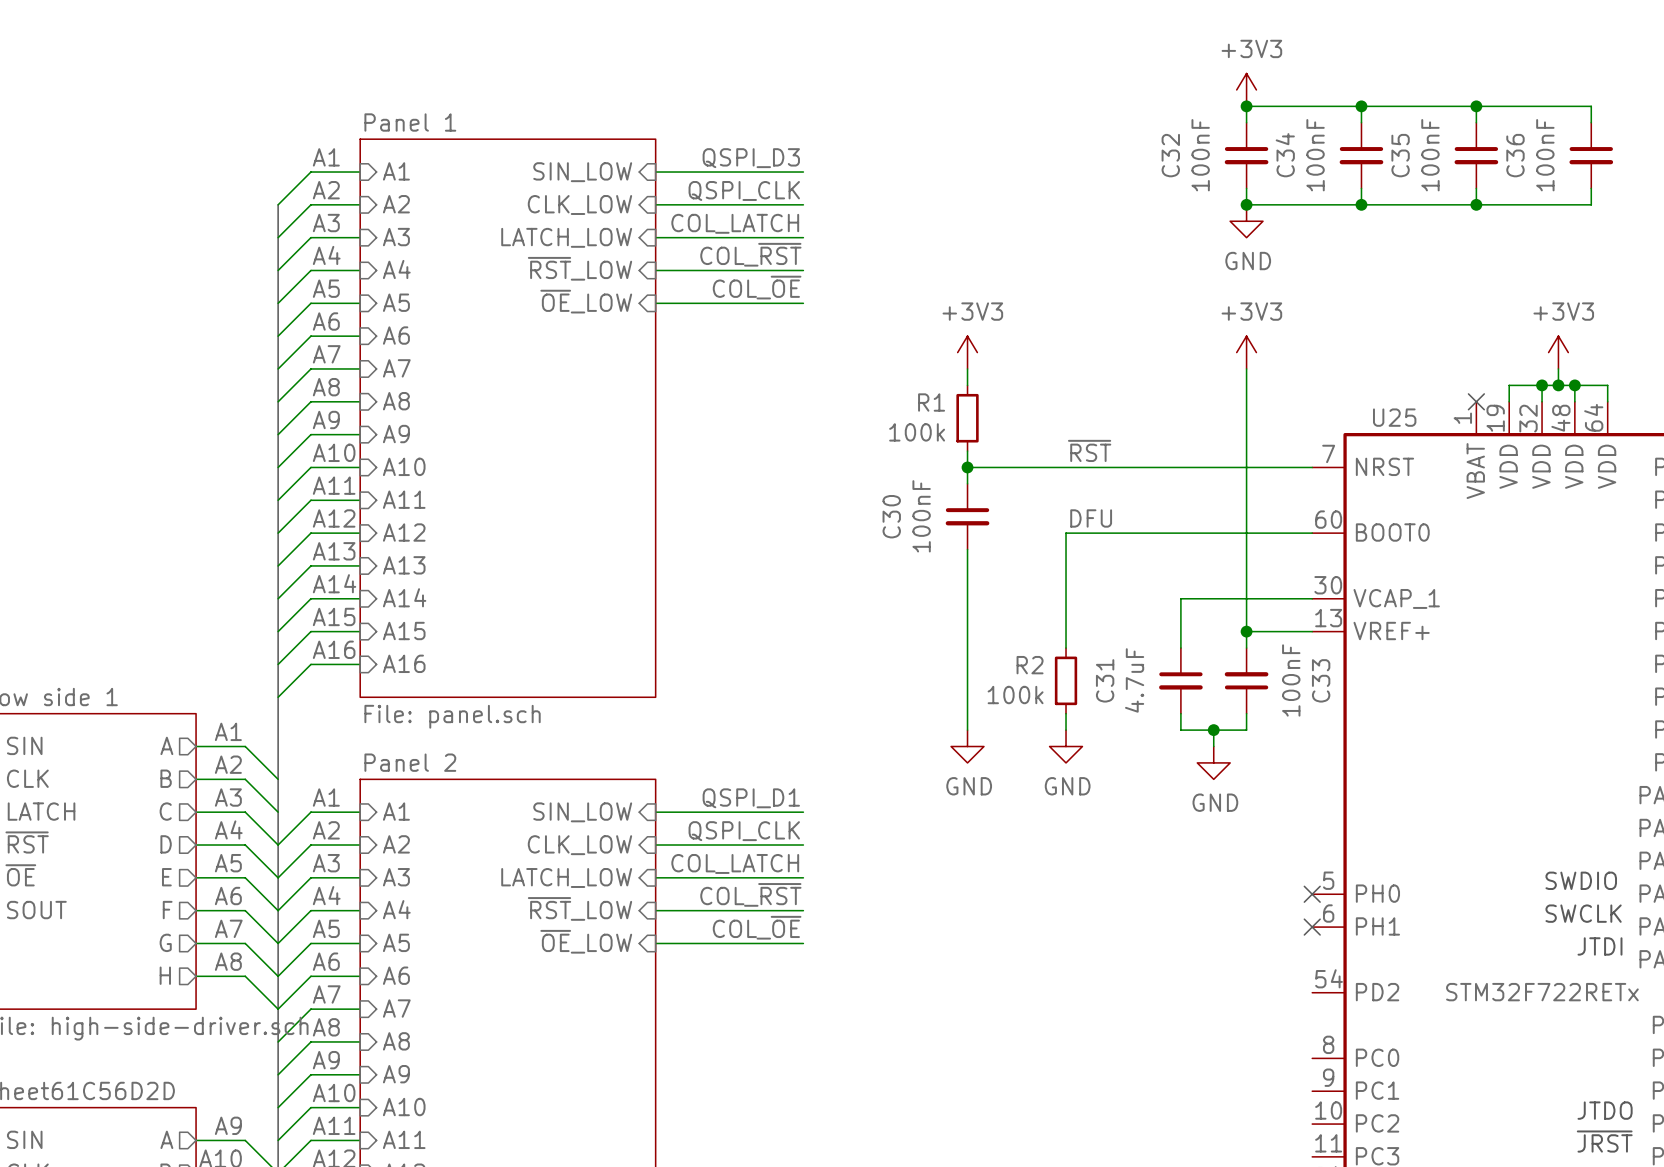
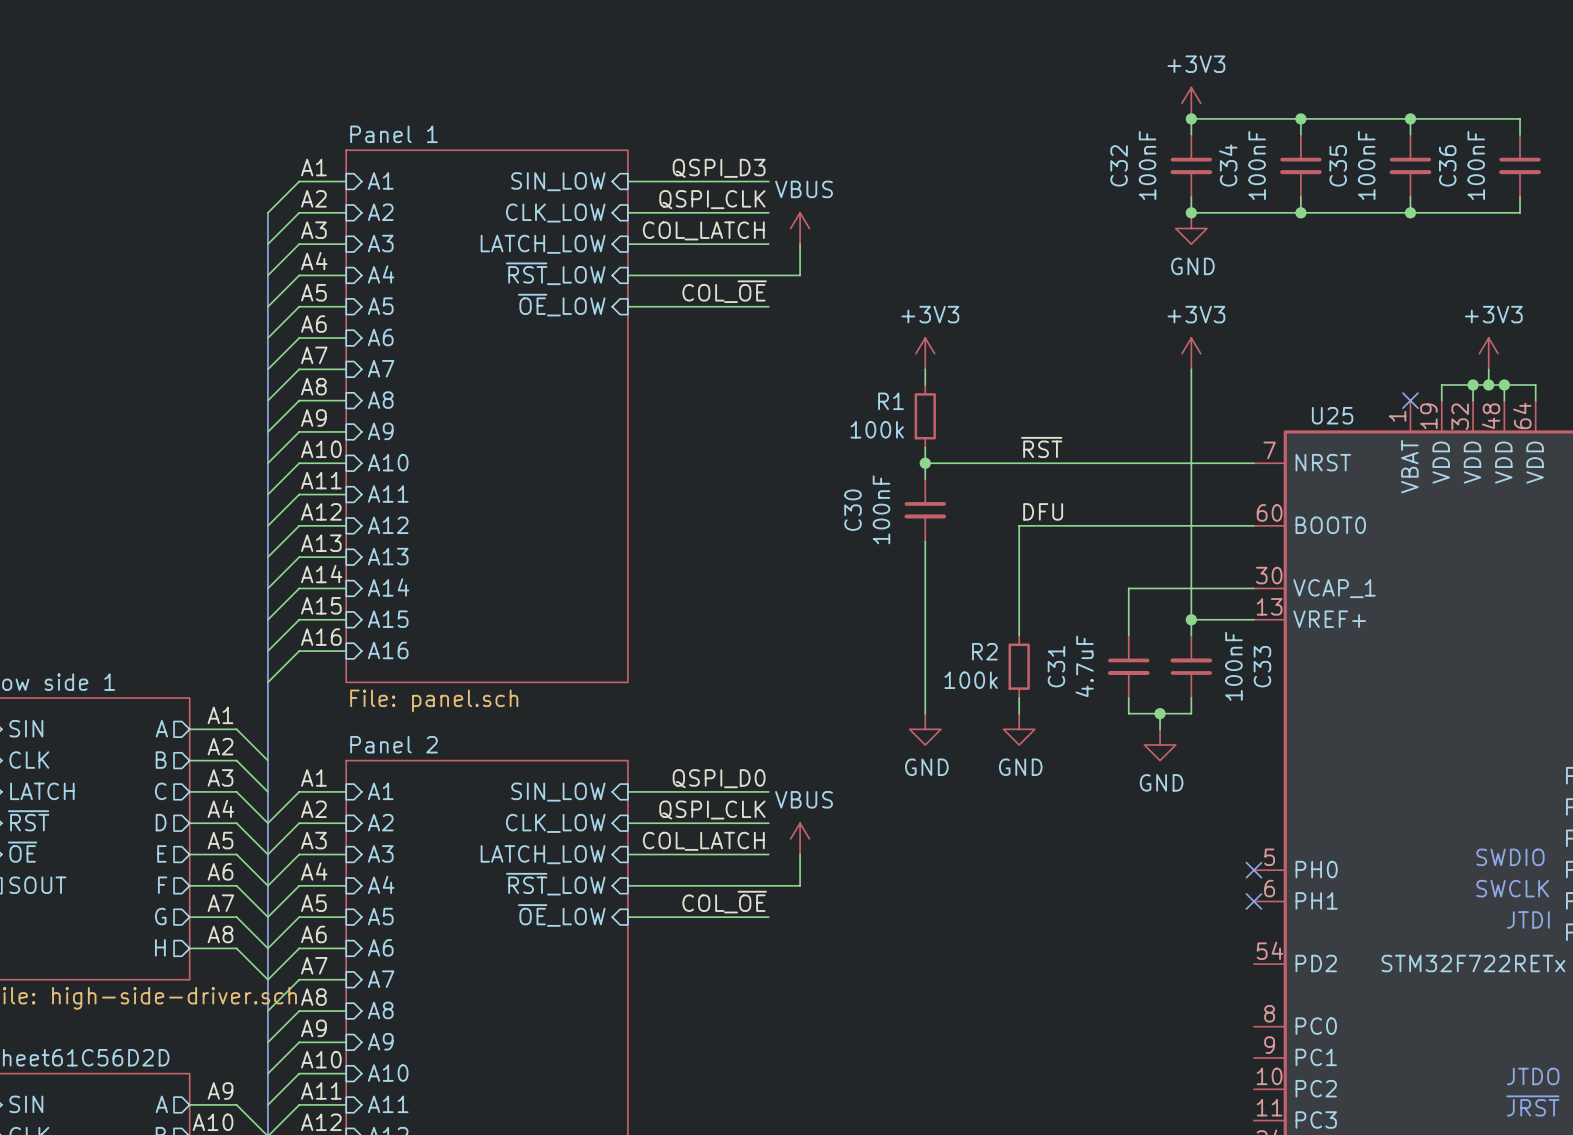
power symbol: none -> VBUS (800, 228)
wire: none -> (800, 244) (800, 275) (768, 275)
label: COL_~{RST} (750, 254) -> none
label: QSPI_D1 (751, 798) -> QSPI_D0 (719, 778)
power symbol: none -> VBUS (800, 838)
wire: none -> (800, 854) (800, 885) (768, 885)
label: COL_~{RST} (750, 894) -> none

